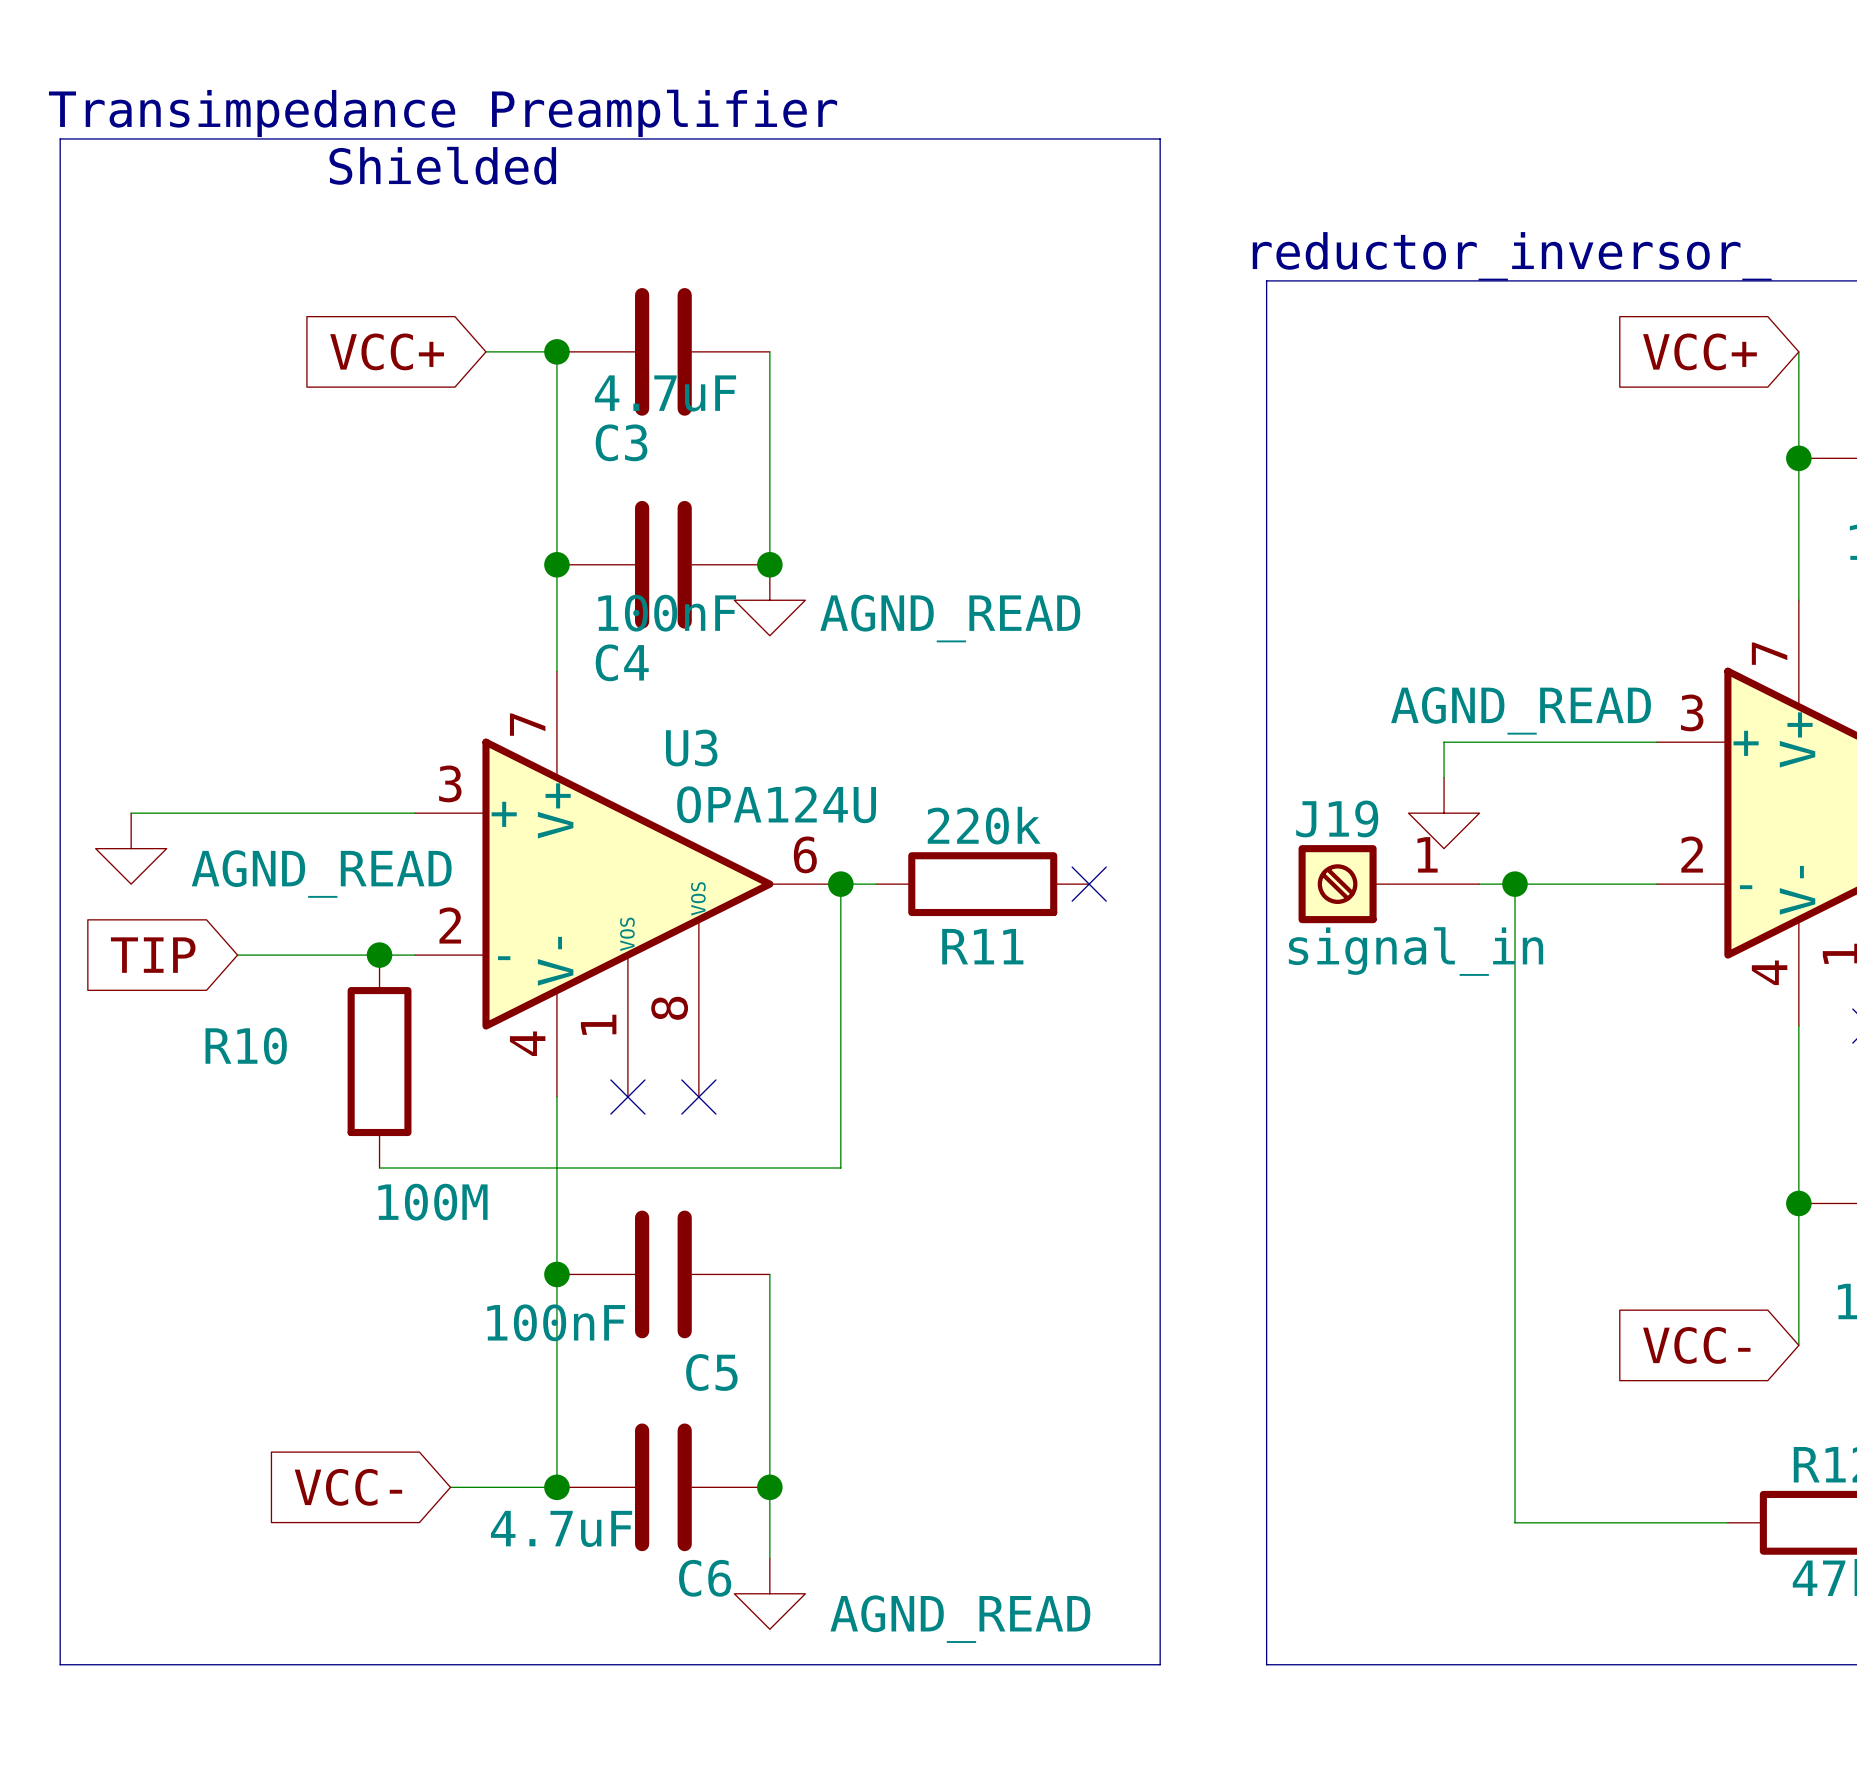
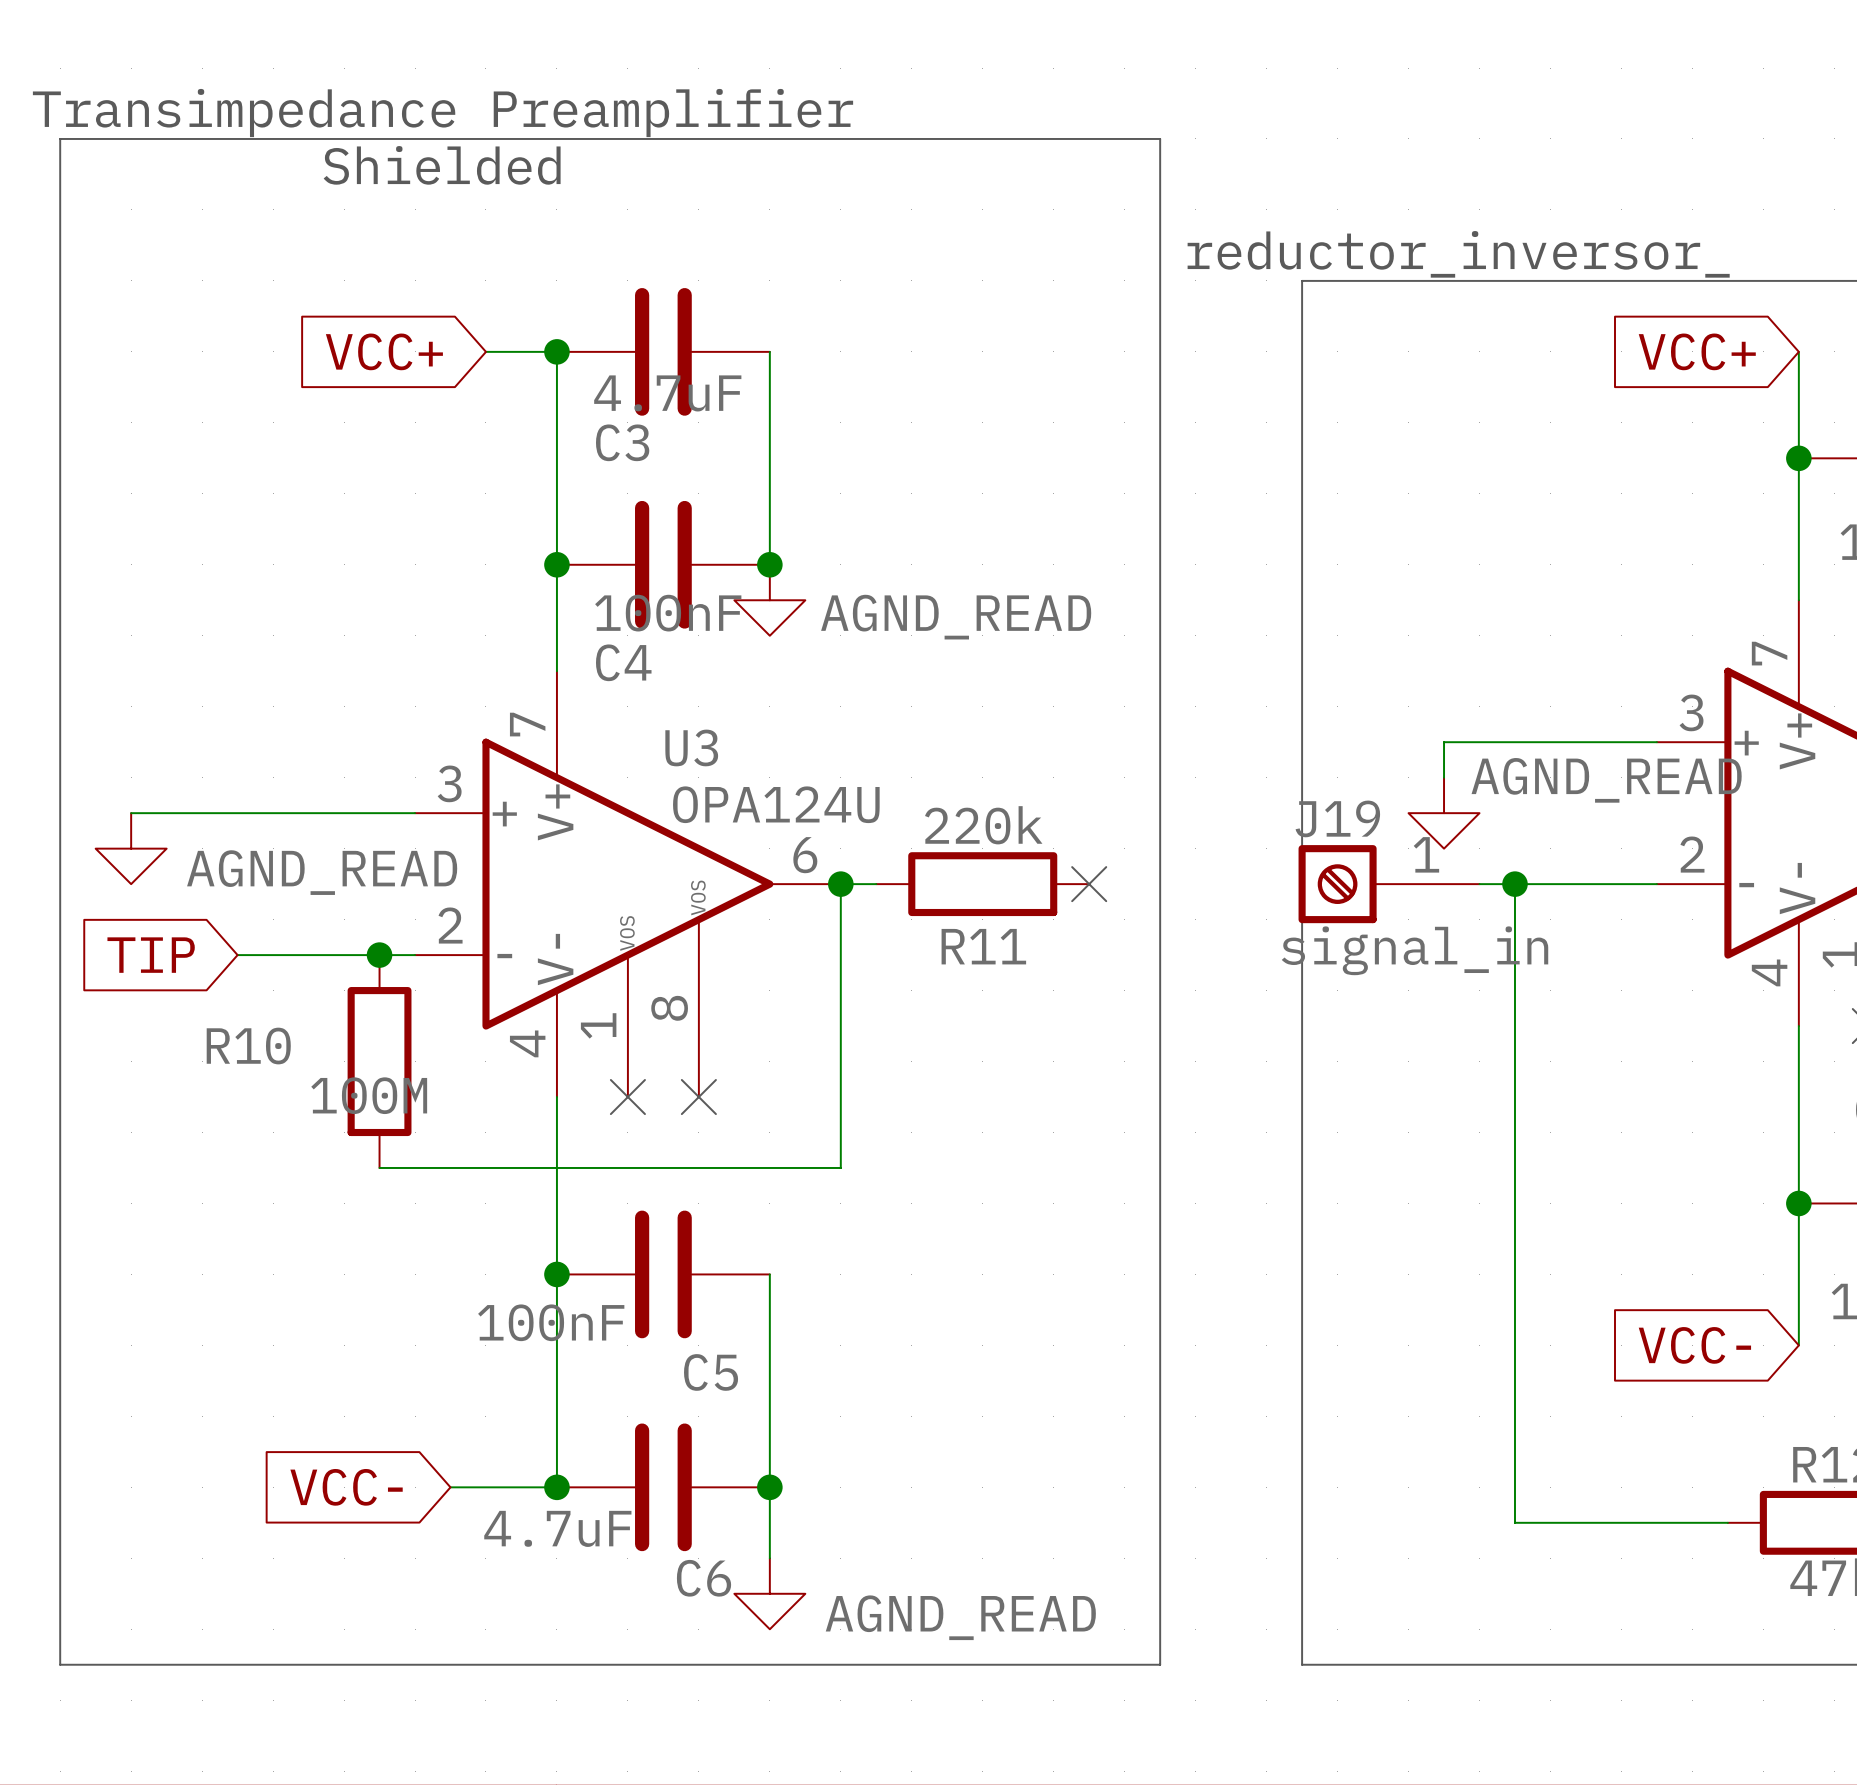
text position: reductor_inversor_ (1512, 256) -> reductor_inversor_ (1458, 254)
line: (1302, 280) (1266, 280) (1266, 1664) (1302, 1664) -> (1302, 280) (1302, 1664)
power symbol text position: AGND_READ (1521, 710) -> AGND_READ (1606, 780)
R10 value position: 100M (432, 1202) -> 100M (369, 1095)

